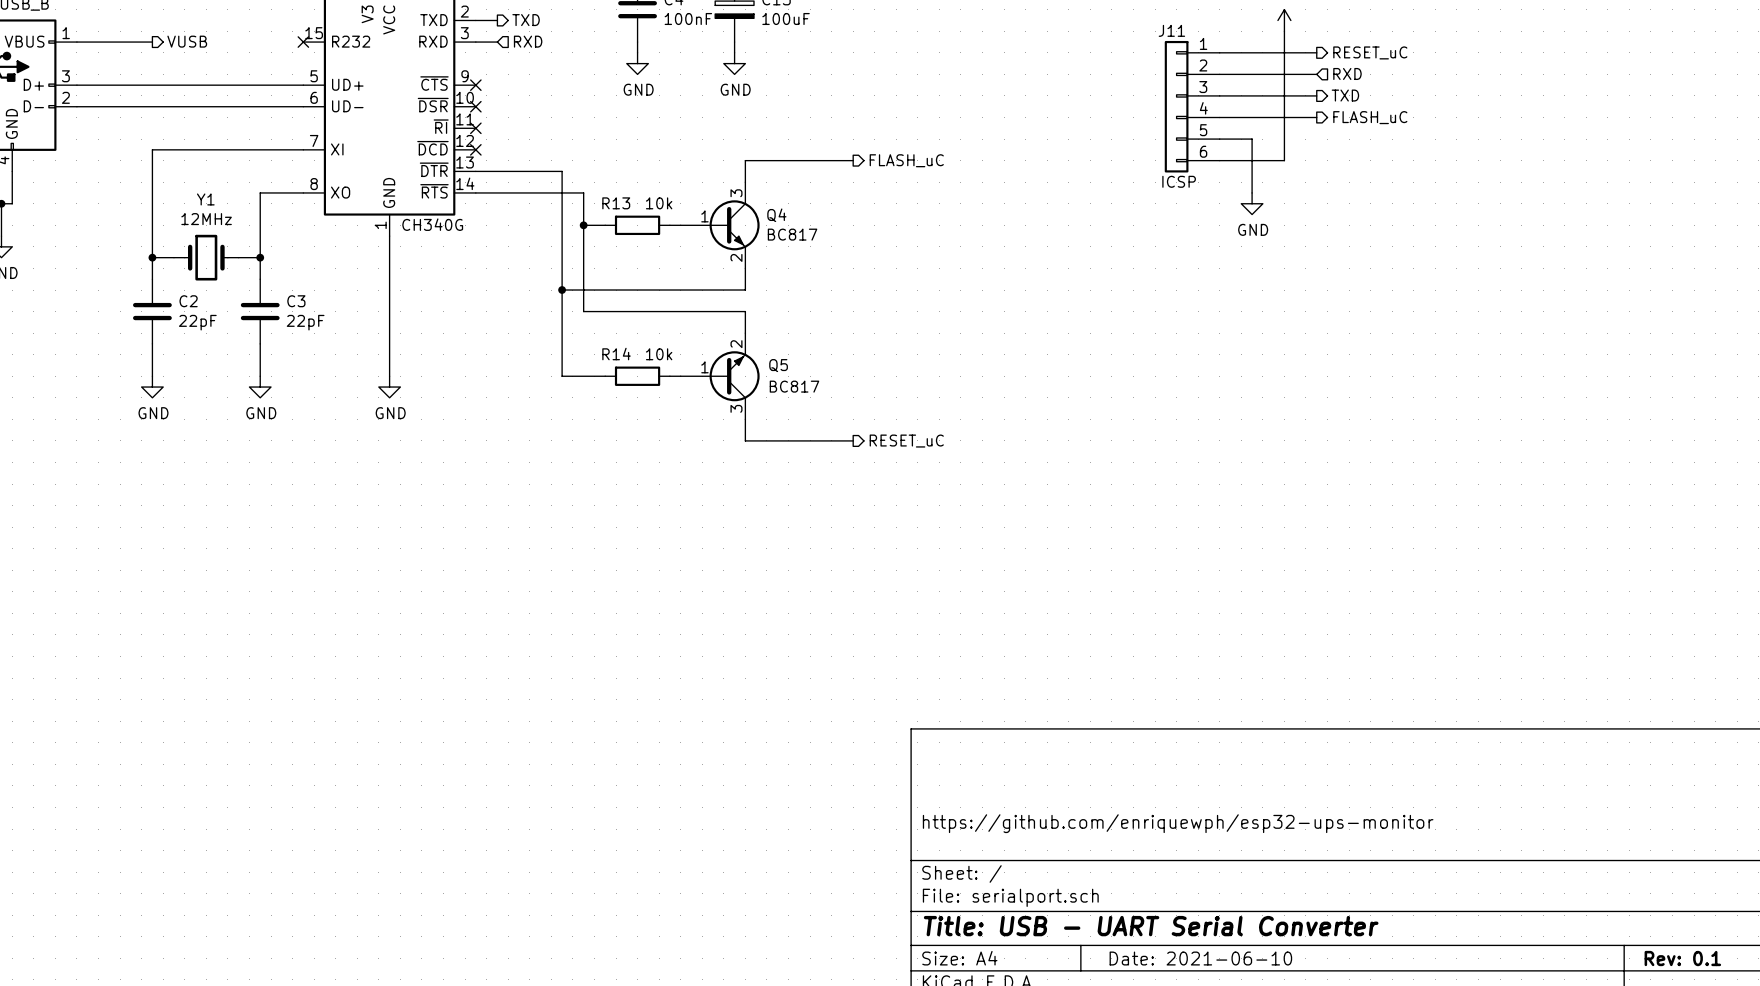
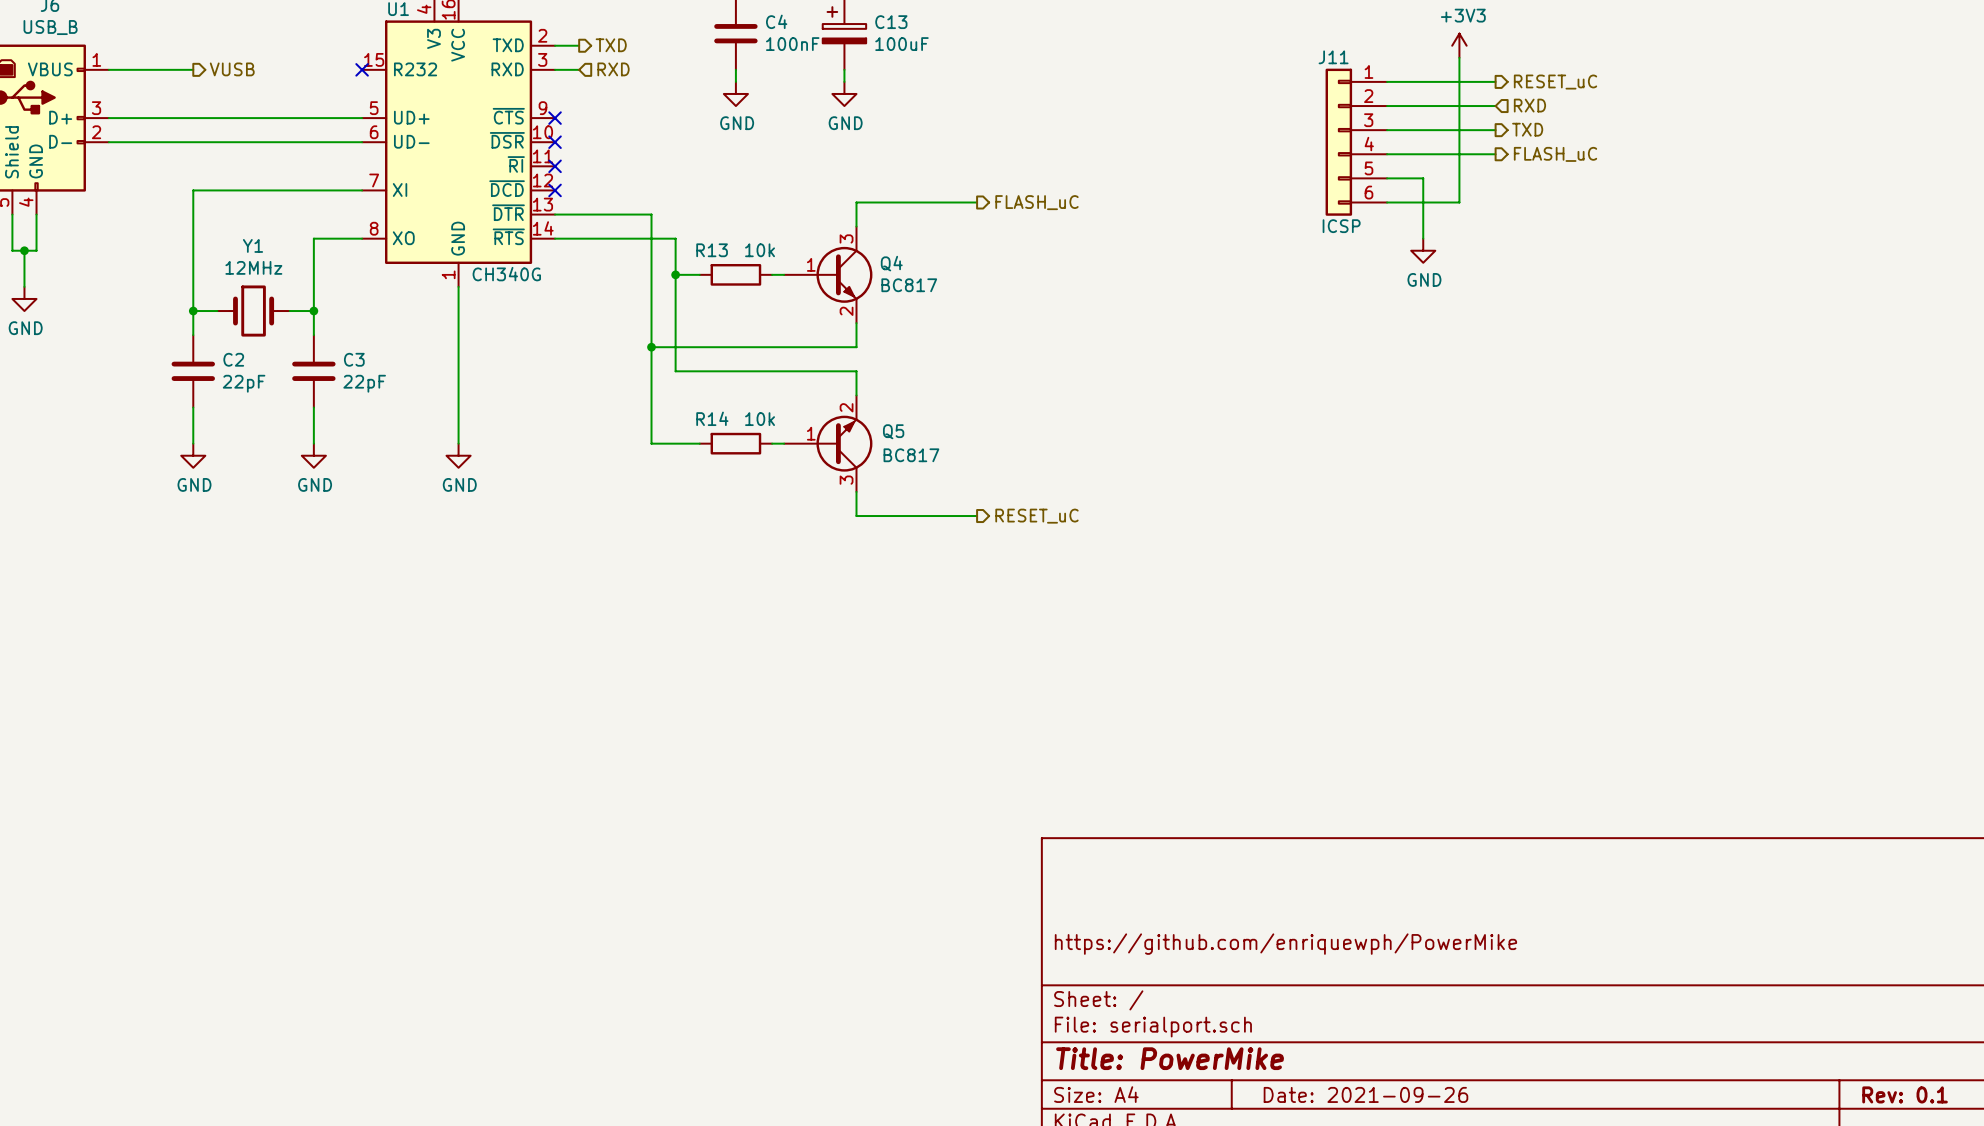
title block: https://github.com/enriquewph/esp32-ups-monitor (1178, 823) -> https://github.com/enriquewph/PowerMike (1285, 944)
title block: Title: USB - UART Serial Converter (1151, 926) -> Title: PowerMike (1170, 1058)
title block: Date: 2021-06-10 (1200, 958) -> Date: 2021-09-26 (1365, 1094)

